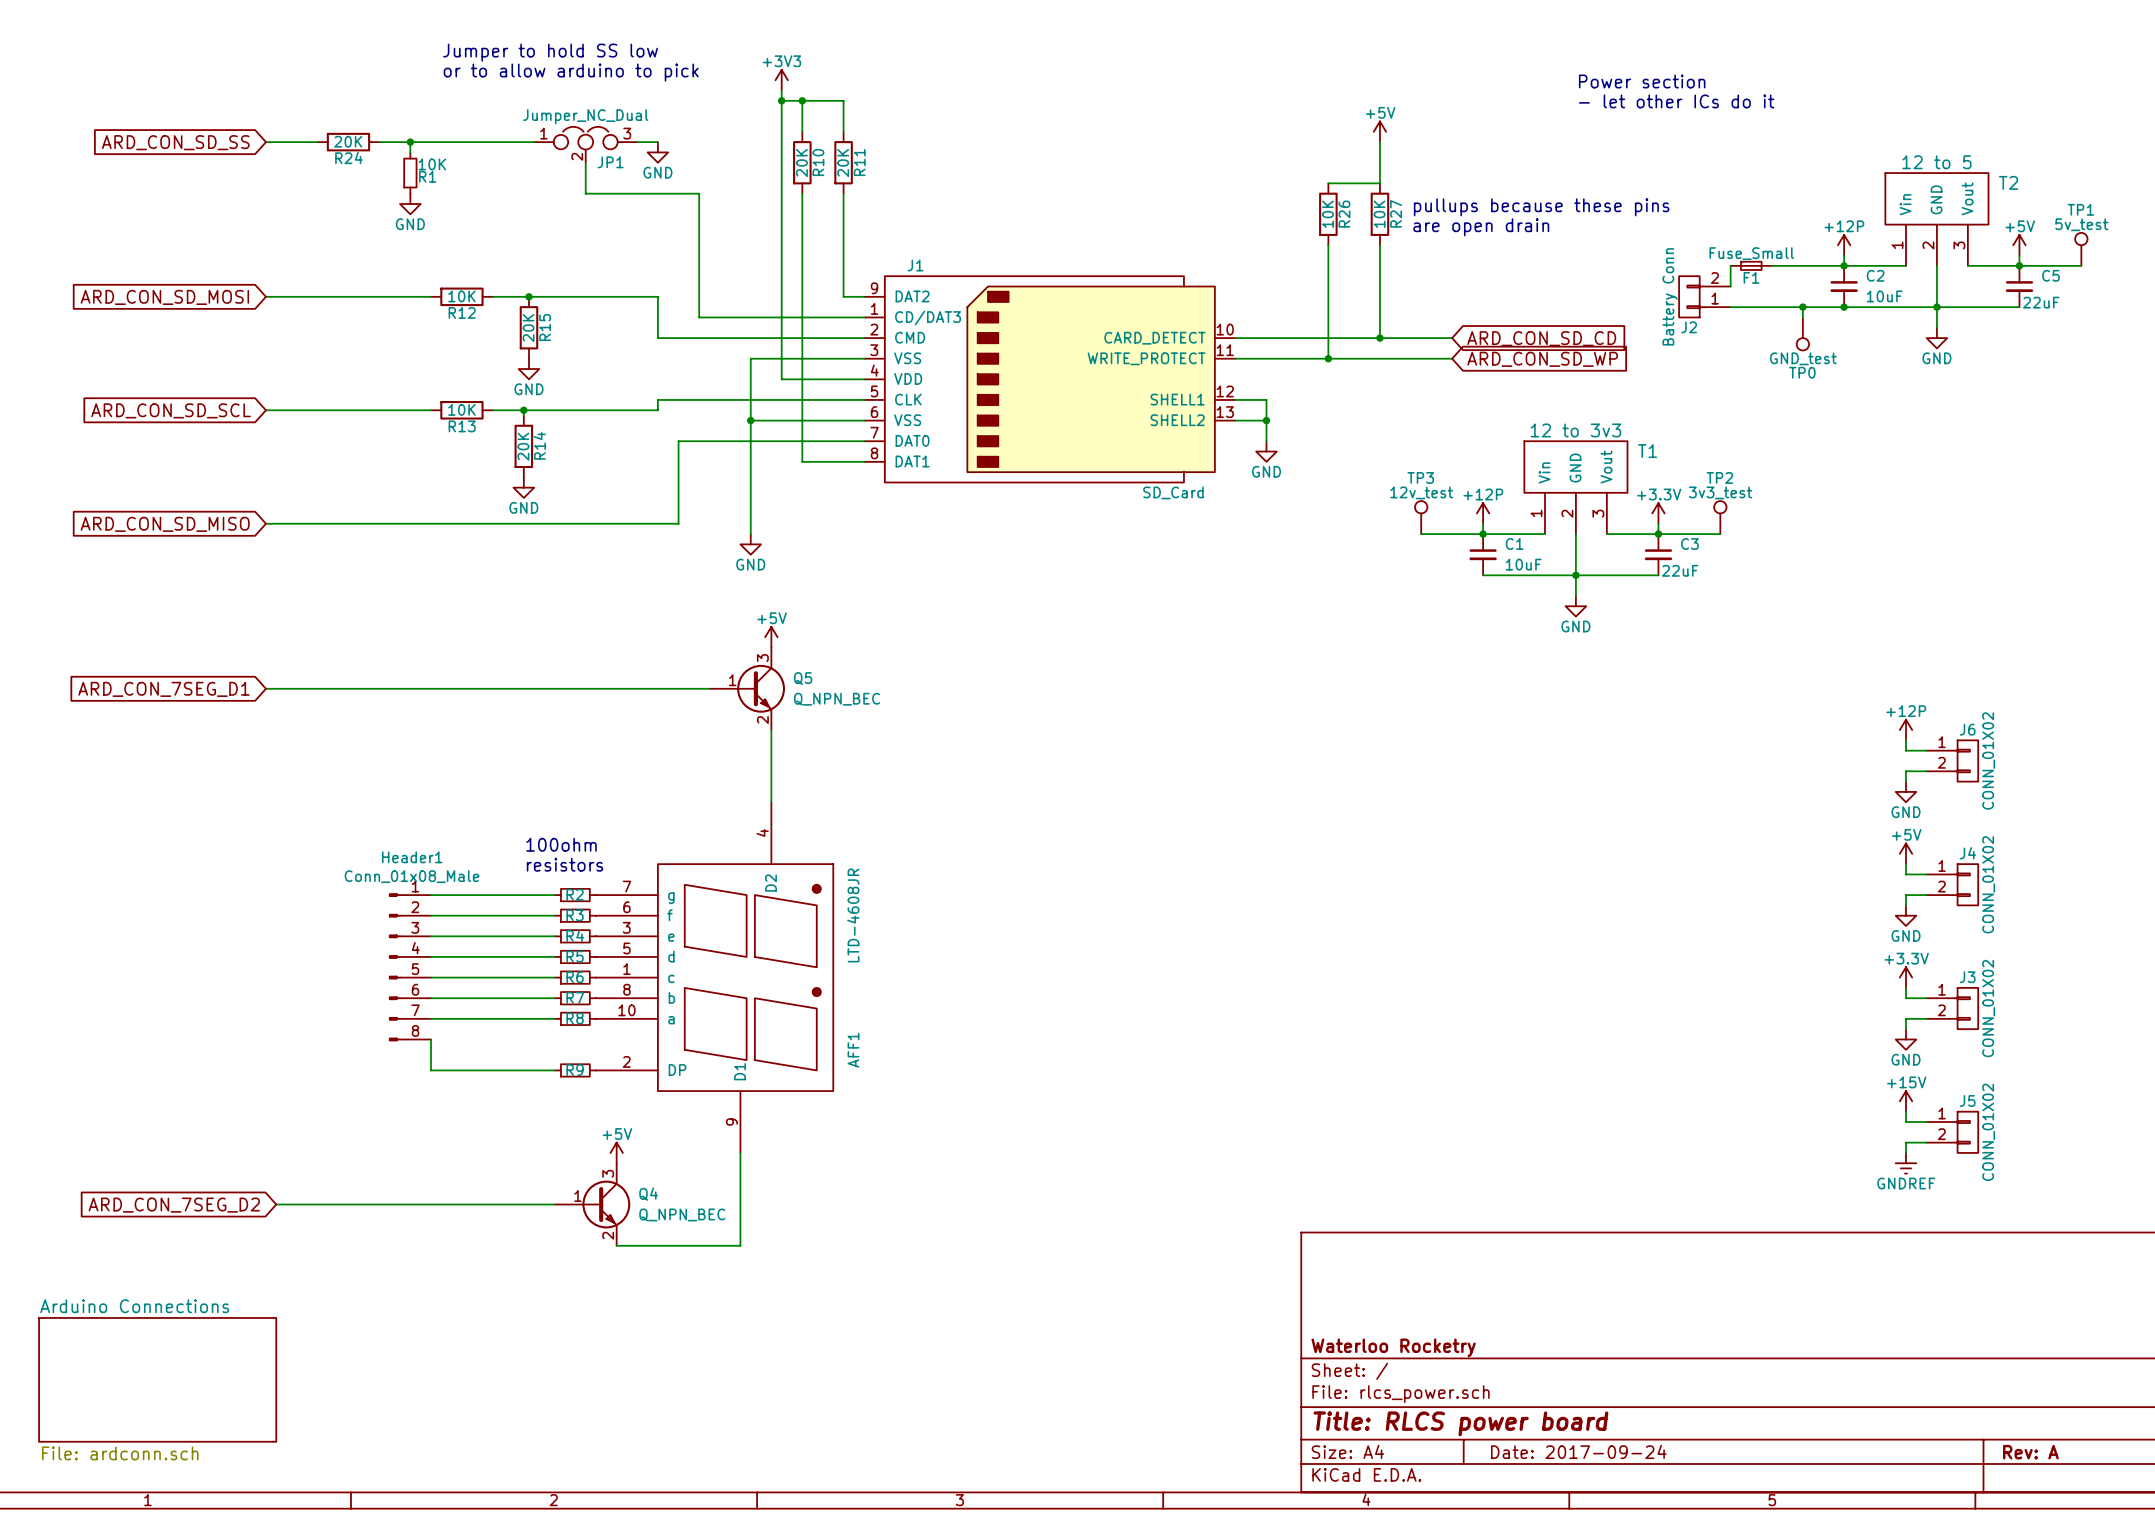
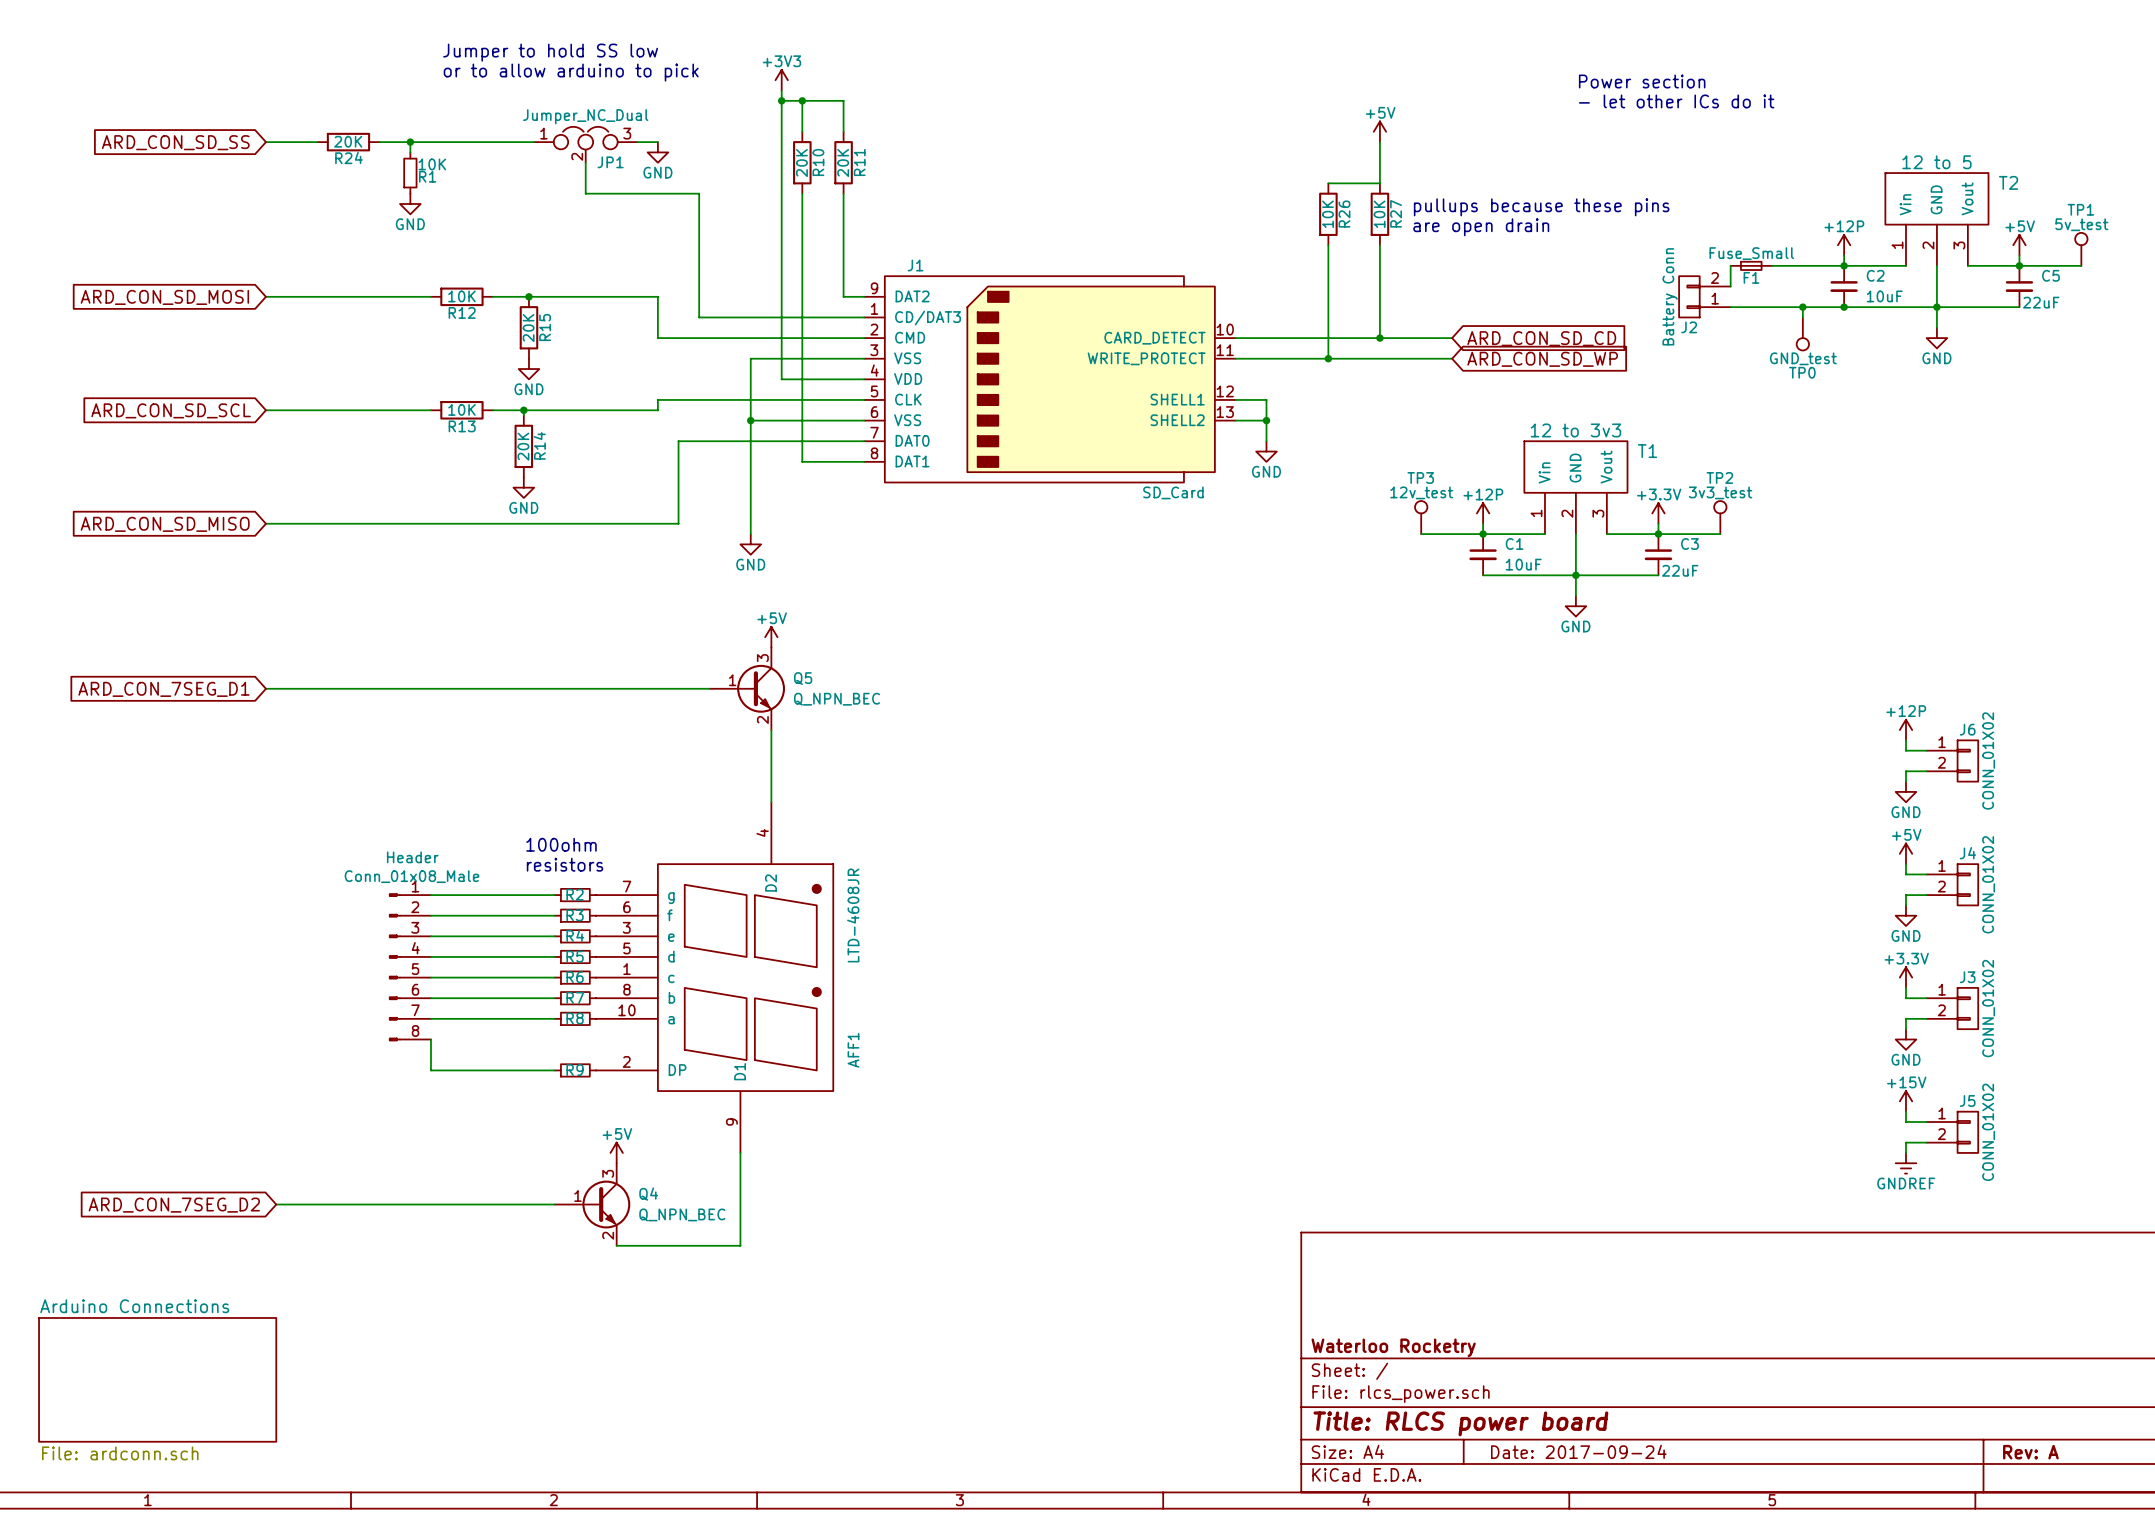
Header1 name: Header1 (412, 857) -> Header (412, 857)

